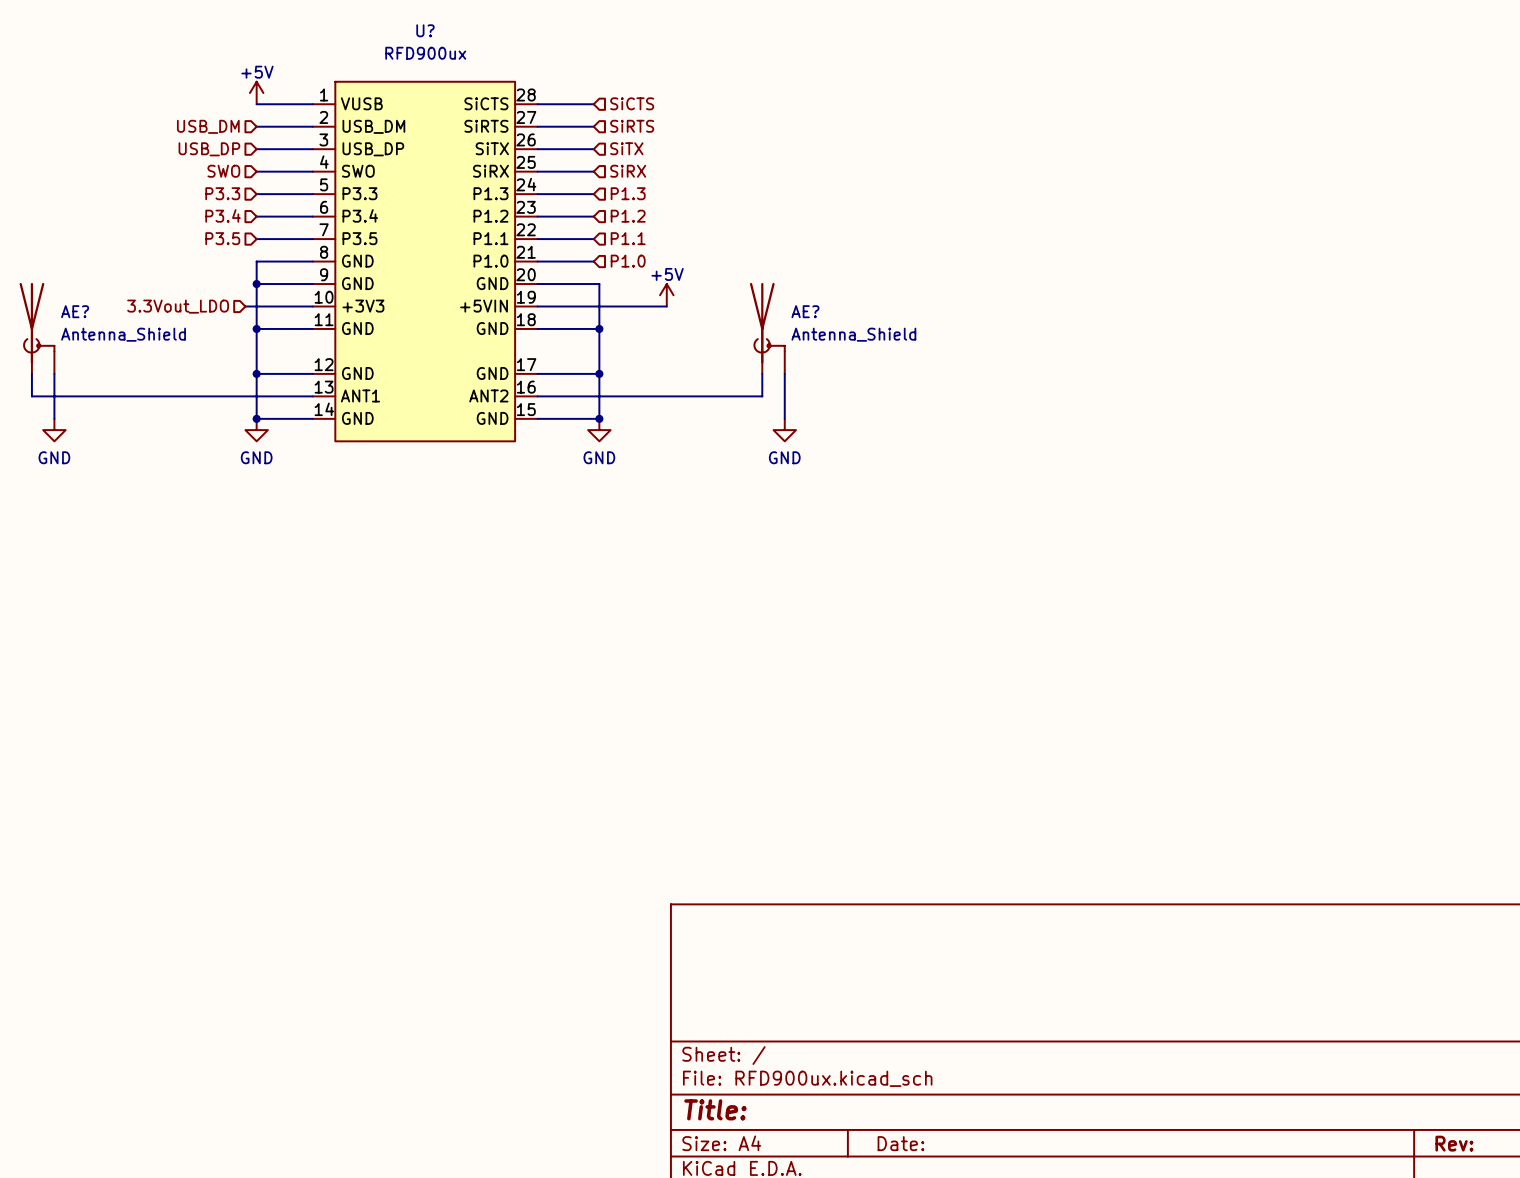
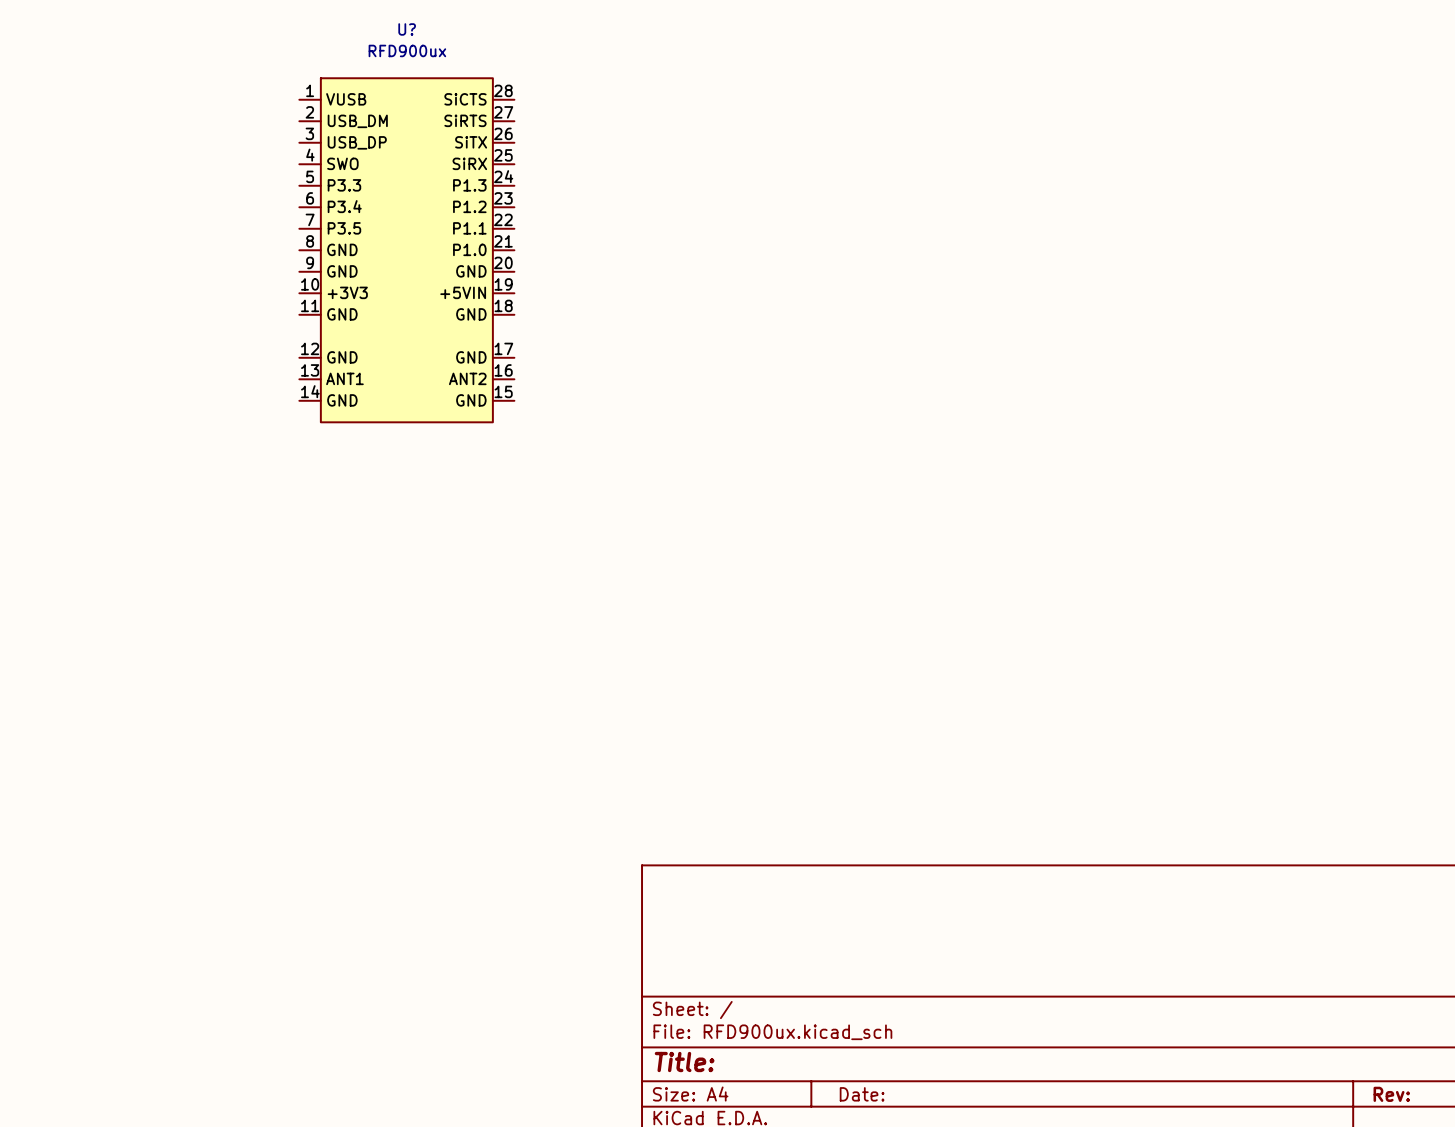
power symbol: +5V (256, 93) -> none
hierarchical label: SiCTS (632, 103) -> none
wire: (256, 104) (312, 104) -> none
wire: (537, 104) (593, 104) -> none
hierarchical label: USB_DM (208, 126) -> none
wire: (256, 126) (312, 126) -> none
wire: (537, 126) (593, 126) -> none
hierarchical label: SiRTS (632, 126) -> none
hierarchical label: SiTX (626, 148) -> none
hierarchical label: USB_DP (209, 149) -> none
wire: (256, 149) (312, 149) -> none
wire: (537, 149) (593, 149) -> none
hierarchical label: SWO (223, 171) -> none
wire: (256, 171) (312, 171) -> none
wire: (537, 171) (593, 171) -> none
hierarchical label: SiRX (628, 171) -> none
hierarchical label: P3.3 (222, 193) -> none
hierarchical label: P1.3 (628, 193) -> none
wire: (256, 194) (312, 194) -> none
wire: (537, 194) (593, 194) -> none
hierarchical label: P3.4 (223, 215) -> none
wire: (256, 216) (312, 216) -> none
wire: (537, 216) (593, 216) -> none
hierarchical label: P1.2 (628, 216) -> none
hierarchical label: P3.5 (222, 238) -> none
hierarchical label: P1.1 (628, 238) -> none
wire: (256, 239) (312, 239) -> none
wire: (537, 239) (593, 239) -> none
wire: (312, 261) (256, 261) (256, 418) (312, 418) -> none
wire: (537, 261) (593, 261) -> none
hierarchical label: P1.0 (628, 261) -> none
wire: (256, 284) (312, 284) -> none
junction: (256, 284) -> none
wire: (537, 284) (599, 284) (599, 418) (537, 418) -> none
power symbol: +5V (666, 295) -> none
hierarchical label: 3.3Vout_LDO (178, 306) -> none
wire: (245, 306) (312, 306) -> none
wire: (537, 306) (666, 306) -> none
AE?: Antenna_Shield (36, 328) -> none
wire: (256, 328) (312, 328) -> none
junction: (256, 328) -> none
wire: (537, 328) (599, 328) -> none
junction: (599, 328) -> none
AE?: Antenna_Shield (767, 328) -> none
wire: (31, 373) (31, 396) (312, 396) -> none
wire: (54, 373) (54, 418) -> none
wire: (256, 373) (312, 373) -> none
junction: (256, 373) -> none
wire: (537, 373) (599, 373) -> none
junction: (599, 373) -> none
wire: (762, 373) (762, 396) (537, 396) -> none
wire: (784, 373) (784, 418) -> none
junction: (256, 418) -> none
junction: (599, 418) -> none
power symbol: GND (54, 430) -> none
power symbol: GND (256, 430) -> none
power symbol: GND (599, 430) -> none
power symbol: GND (784, 430) -> none

